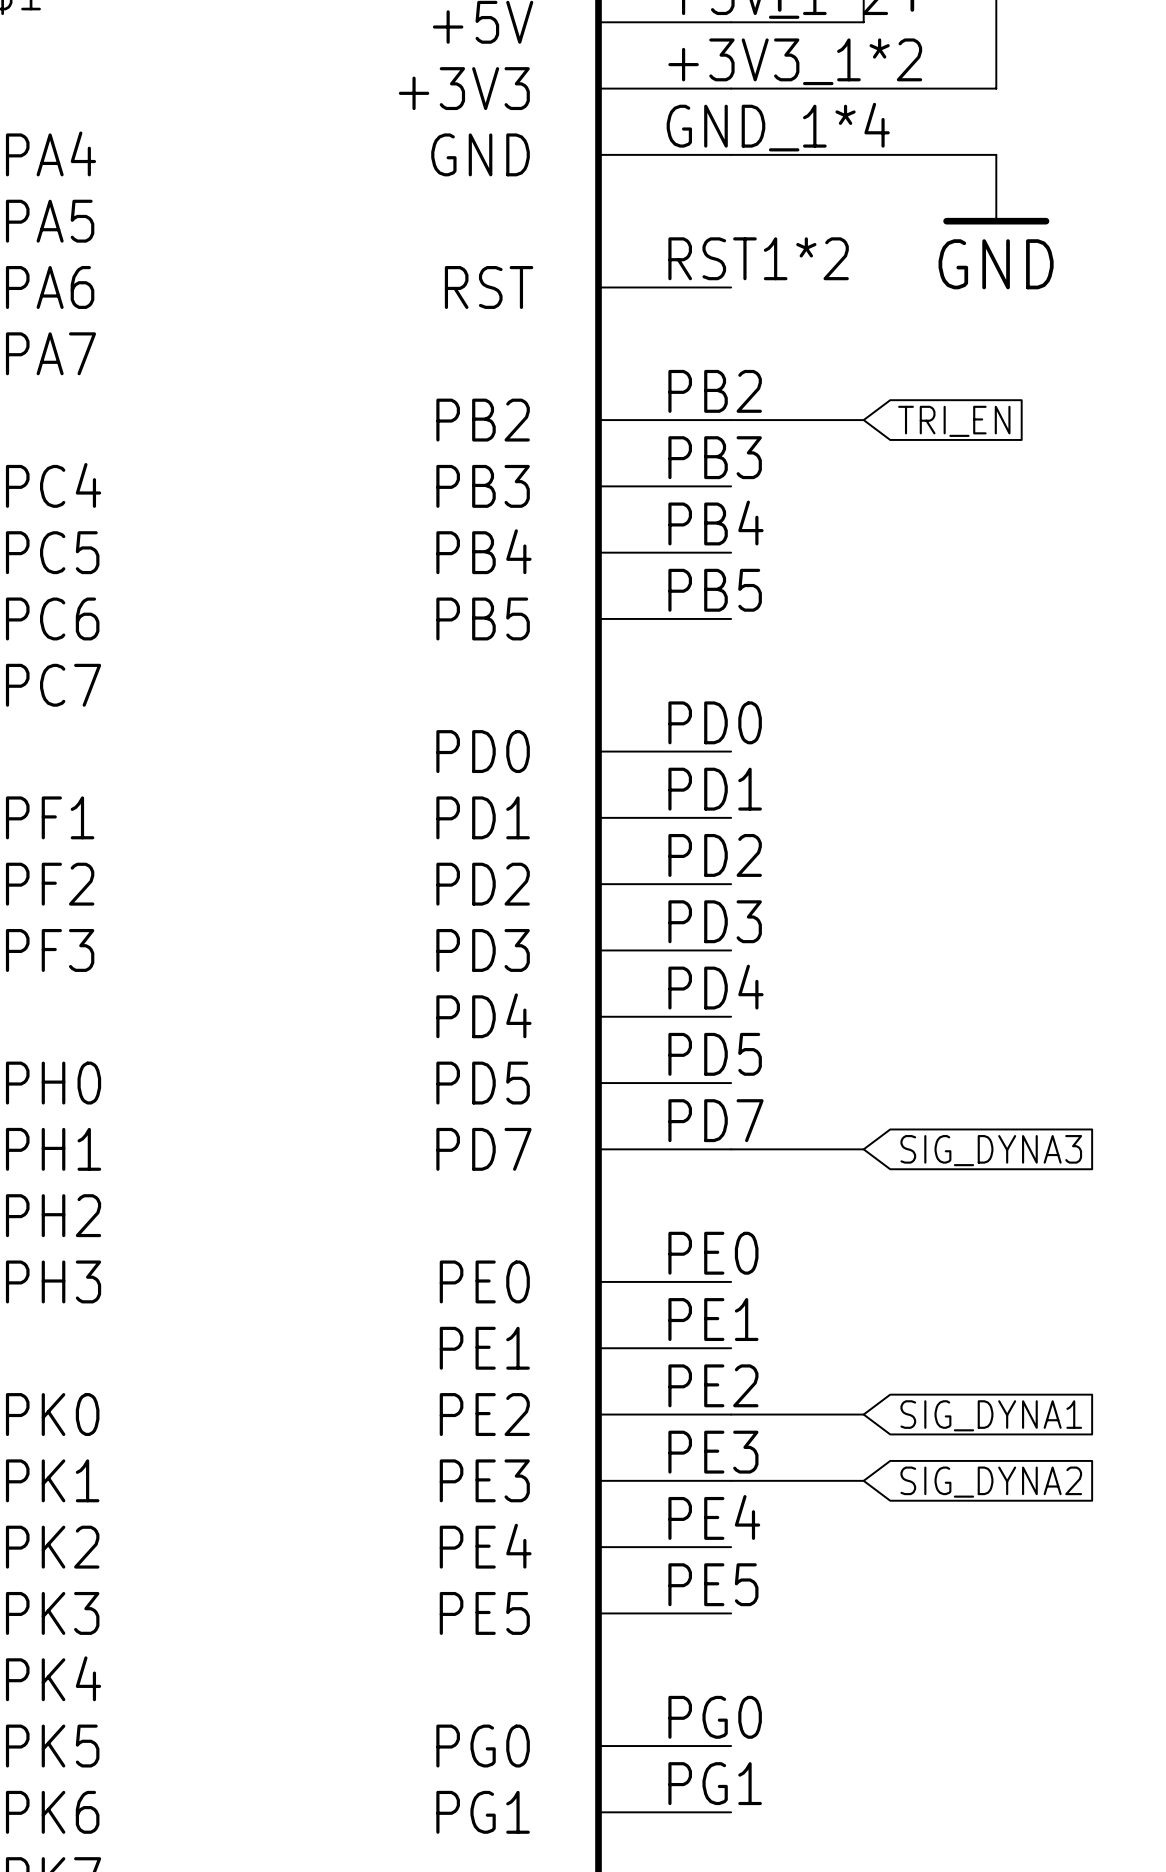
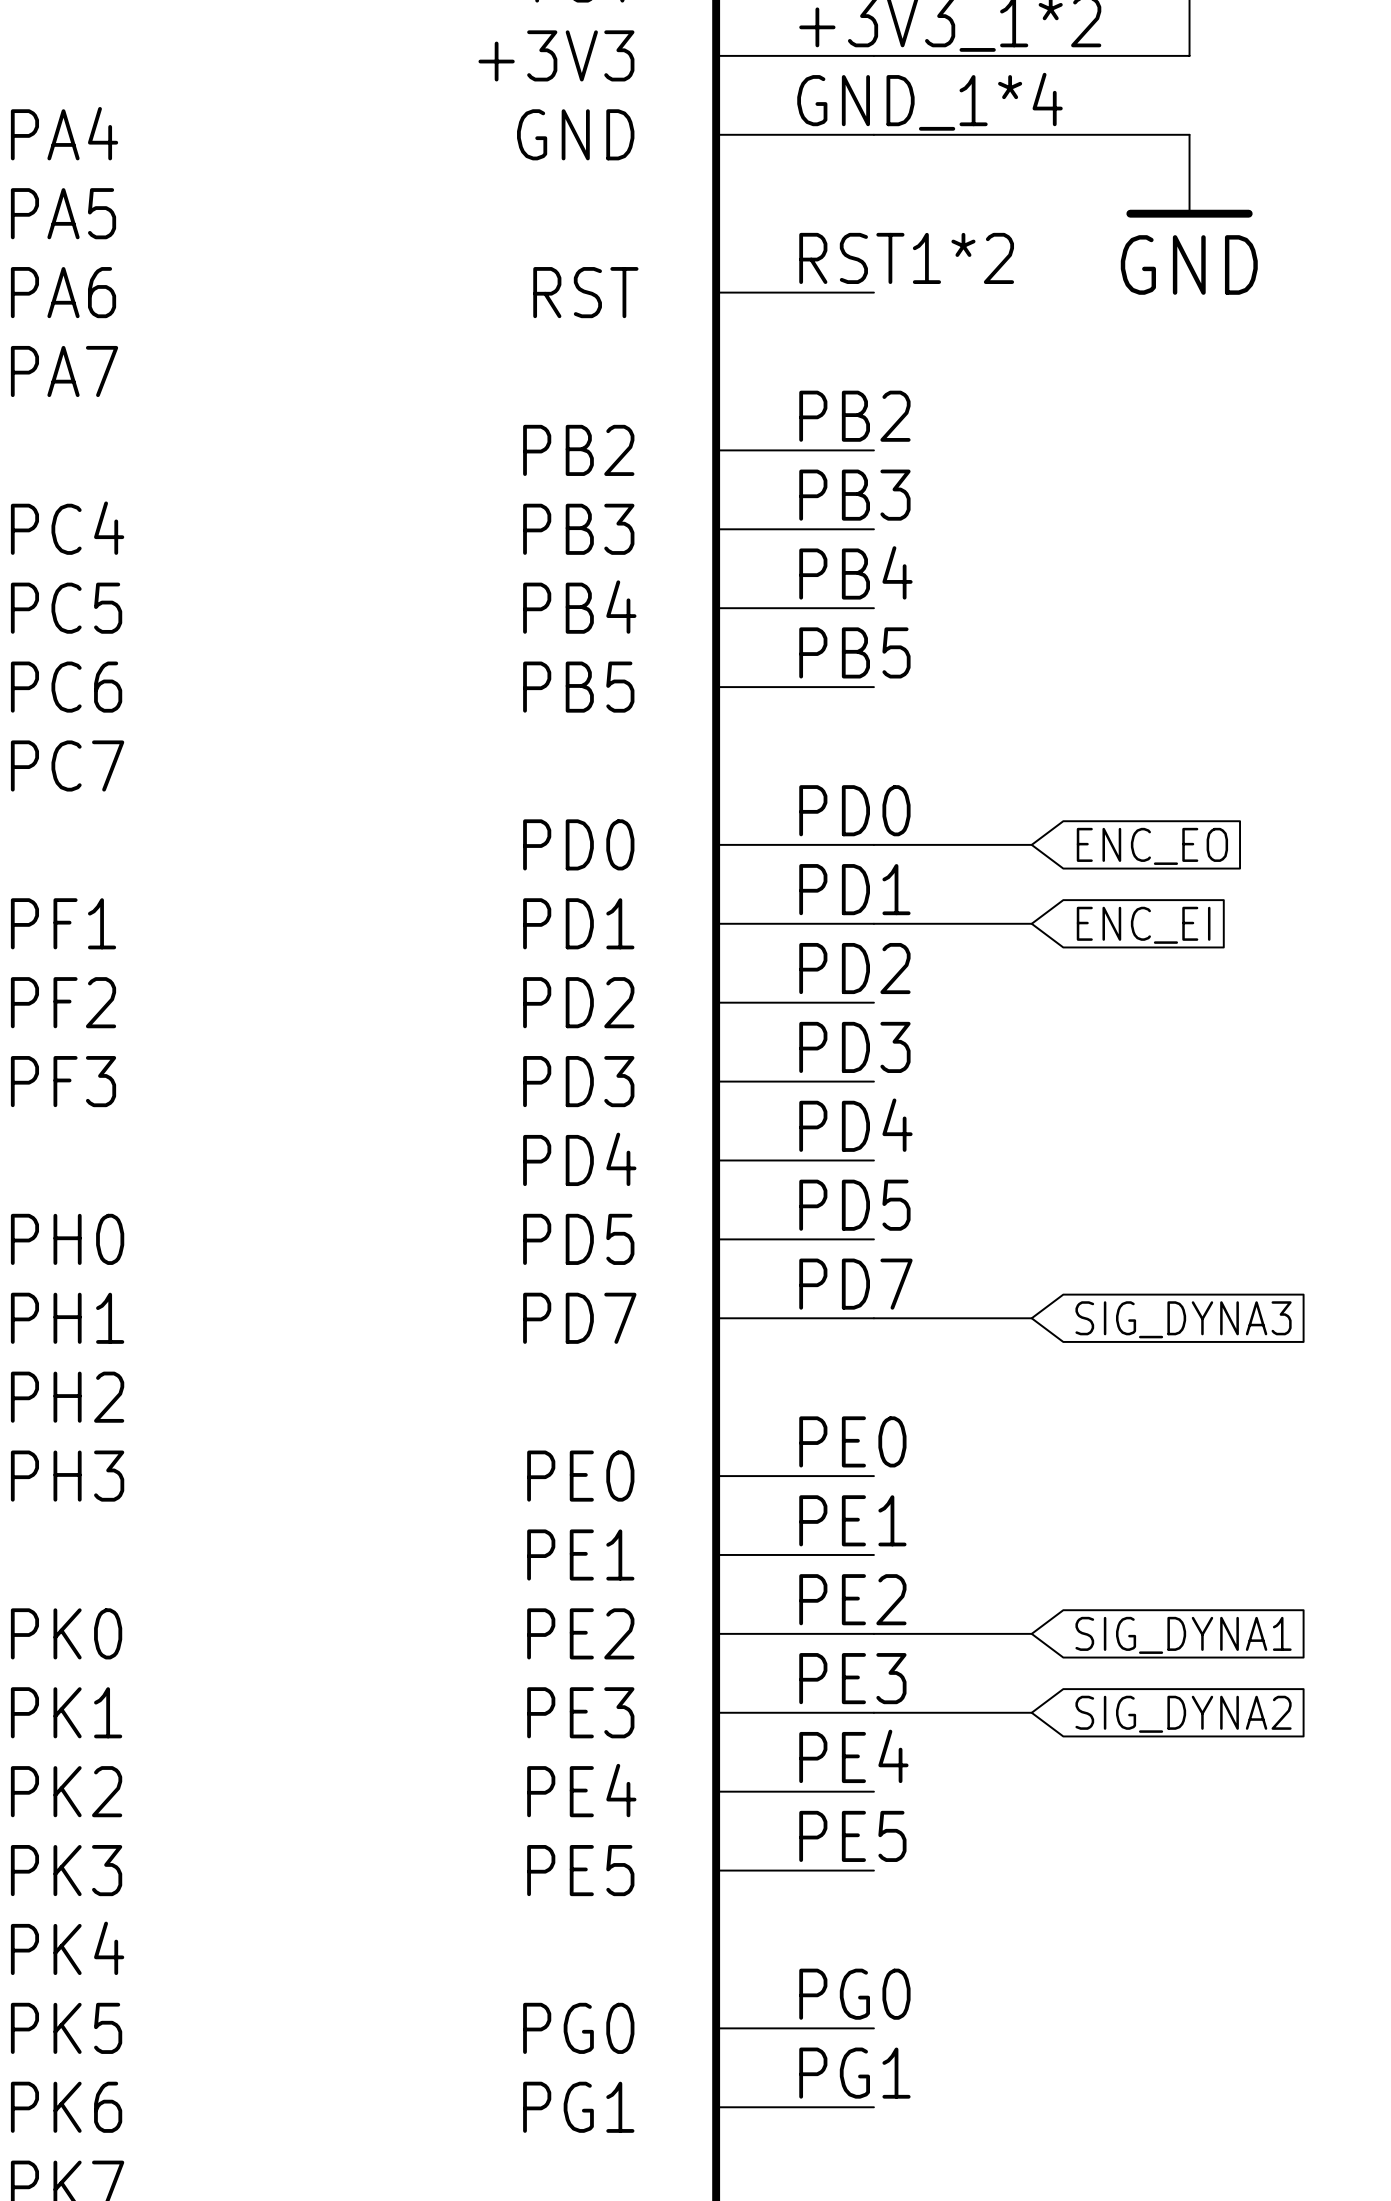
wire: (731, 420) (863, 420) -> (873, 844) (1031, 844)
global label: TRI_EN (954, 421) -> none
global label: none -> ENC_EO (1152, 846)
wire: none -> (873, 923) (1031, 923)
global label: none -> ENC_EI (1143, 925)

